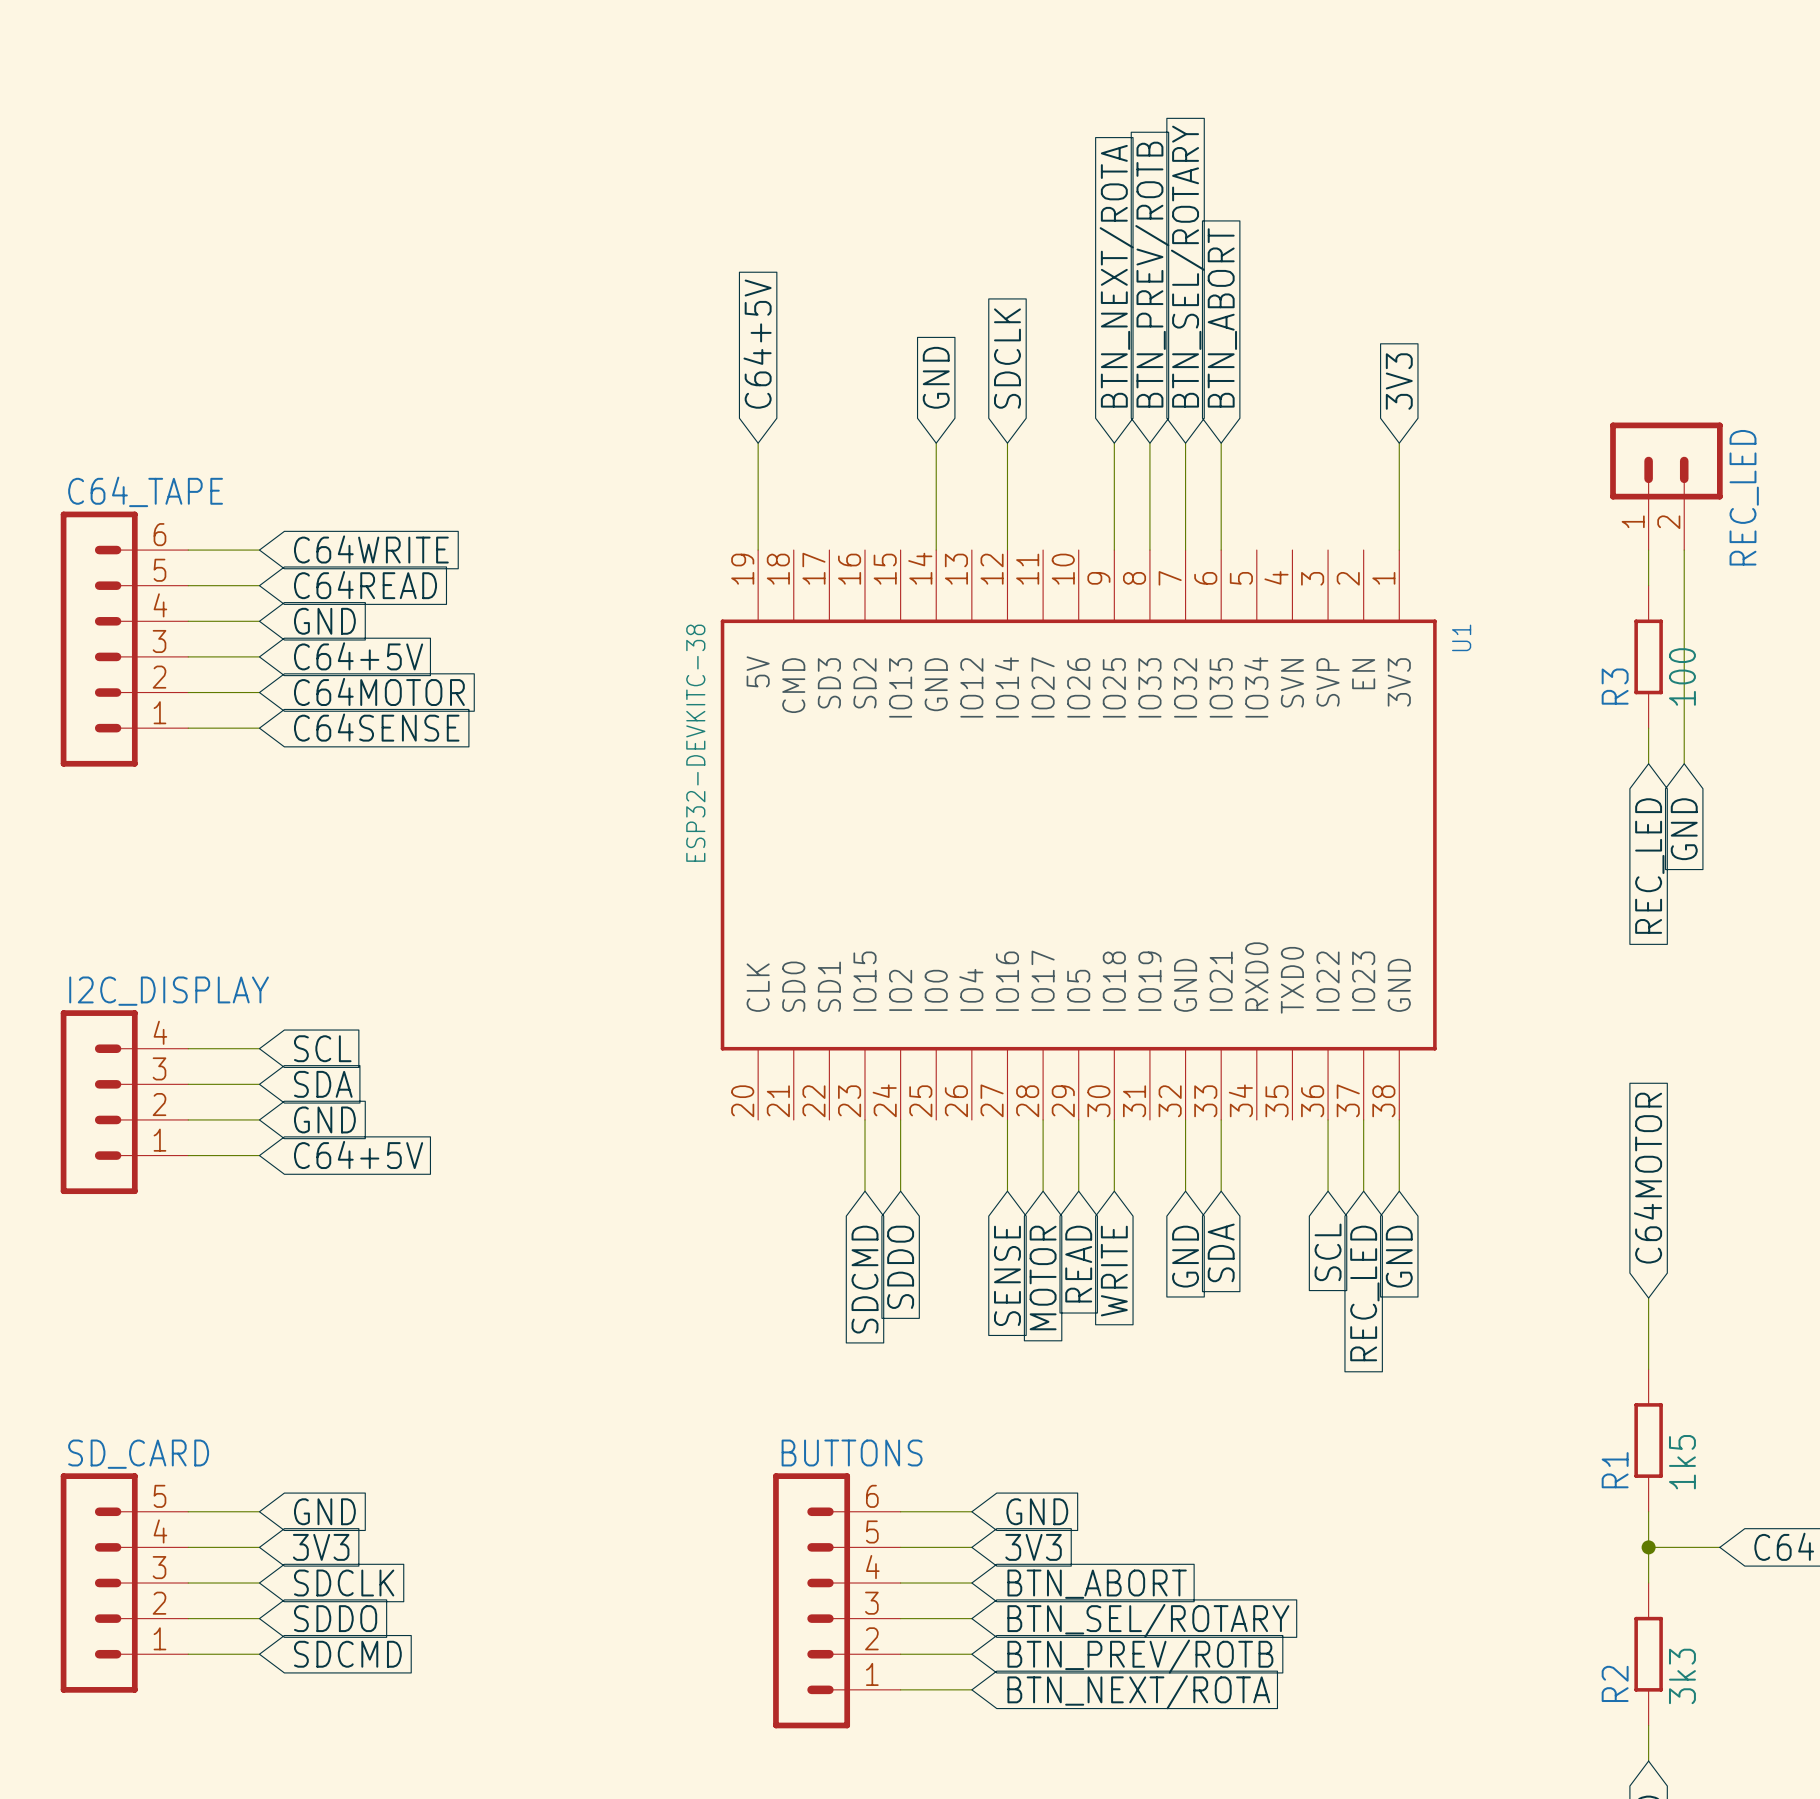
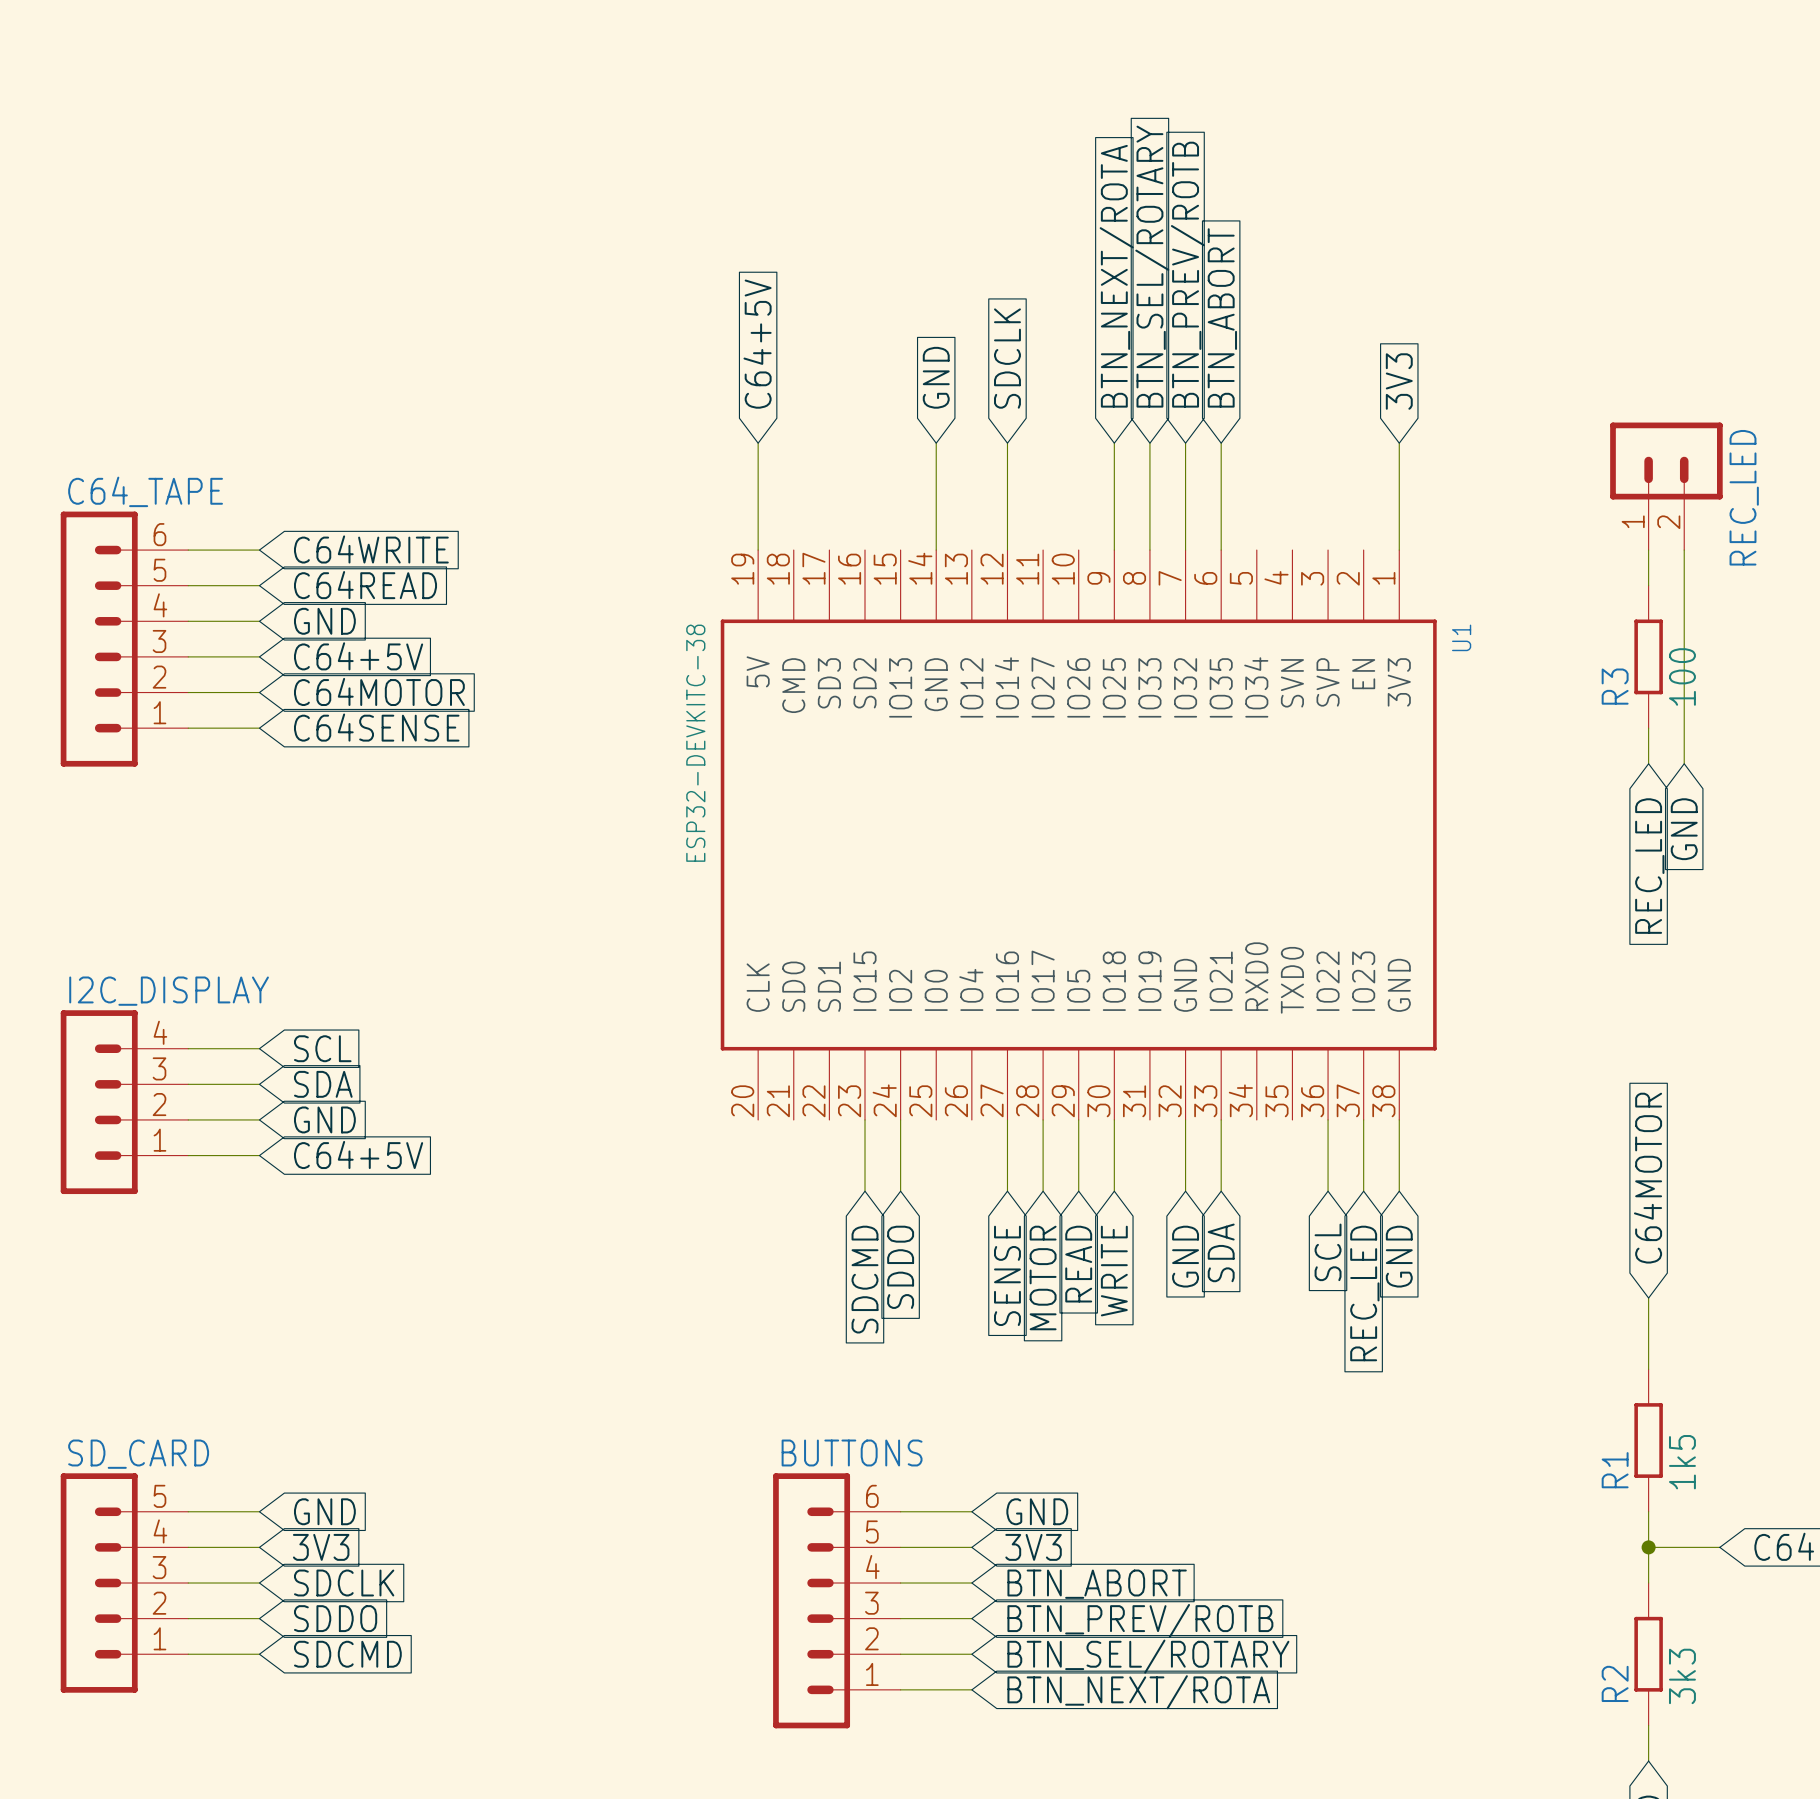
global label: BTN_SEL/ROTARY (1187, 266) -> BTN_PREV/ROTB (1187, 274)
global label: BTN_PREV/ROTB (1152, 274) -> BTN_SEL/ROTARY (1152, 266)
global label: BTN_SEL/ROTARY (1148, 1620) -> BTN_PREV/ROTB (1140, 1620)
global label: BTN_PREV/ROTB (1140, 1656) -> BTN_SEL/ROTARY (1148, 1656)

